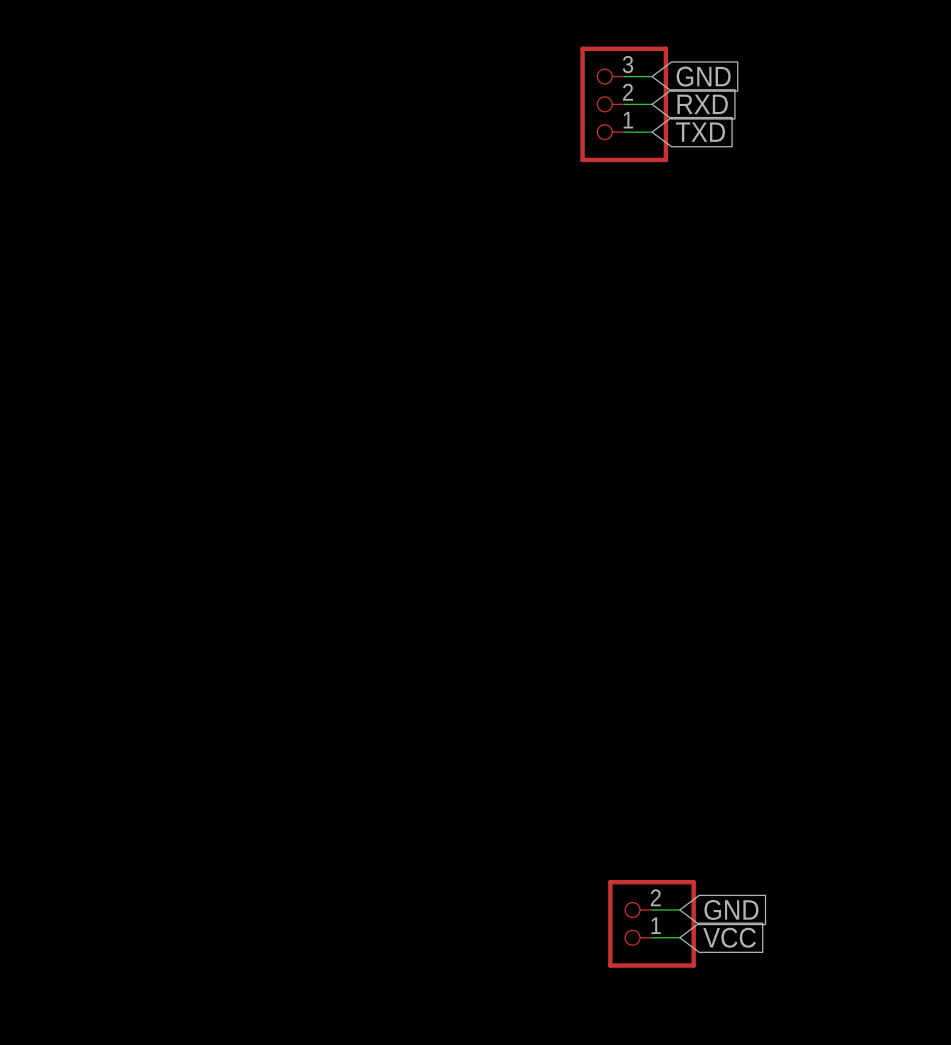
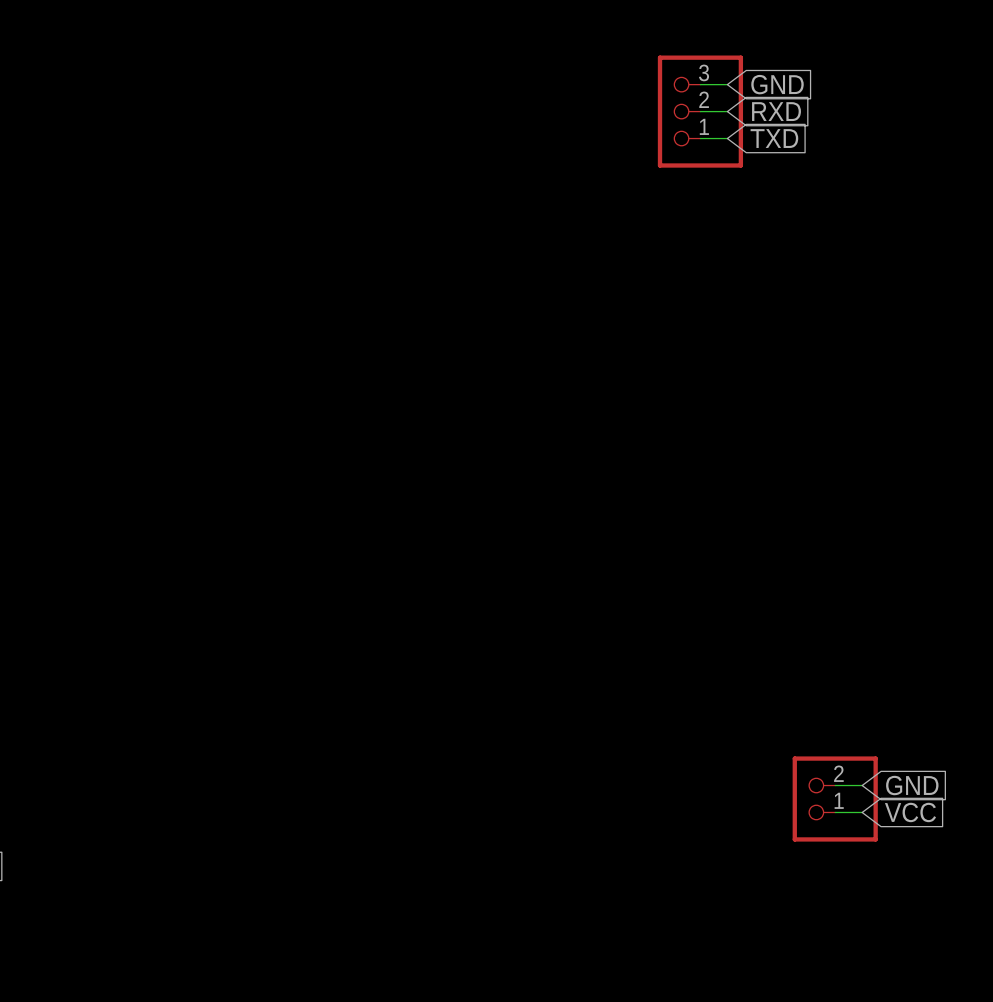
wire: (652, 909) (679, 909) -> (835, 785) (862, 785)
global label position: GND (731, 909) -> GND (912, 785)
part position: (652, 923) -> (835, 799)
wire: (652, 937) (679, 937) -> (835, 812) (862, 812)
global label position: VCC (729, 937) -> VCC (910, 812)

